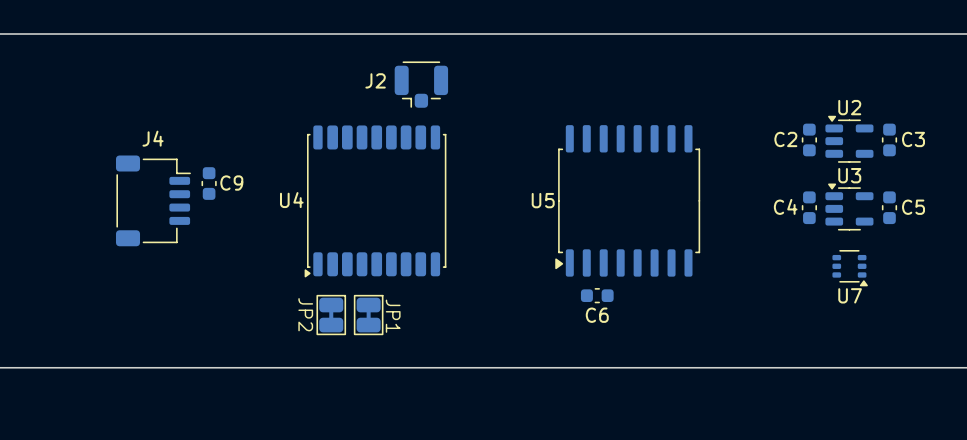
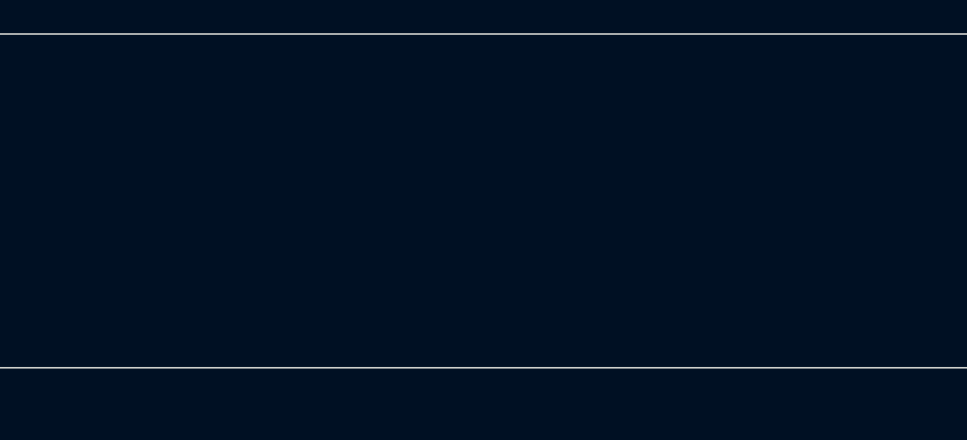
J2: (421, 84) -> none
C2: (809, 139) -> none
U2: (849, 139) -> none
C3: (889, 139) -> none
C9: (209, 183) -> none
J4: (153, 200) -> none
U5: (627, 200) -> none
U4: (375, 201) -> none
C4: (809, 207) -> none
U3: (849, 207) -> none
C5: (889, 207) -> none
U7: (850, 268) -> none
C6: (597, 295) -> none
JP2: (331, 315) -> none
JP1: (368, 315) -> none

